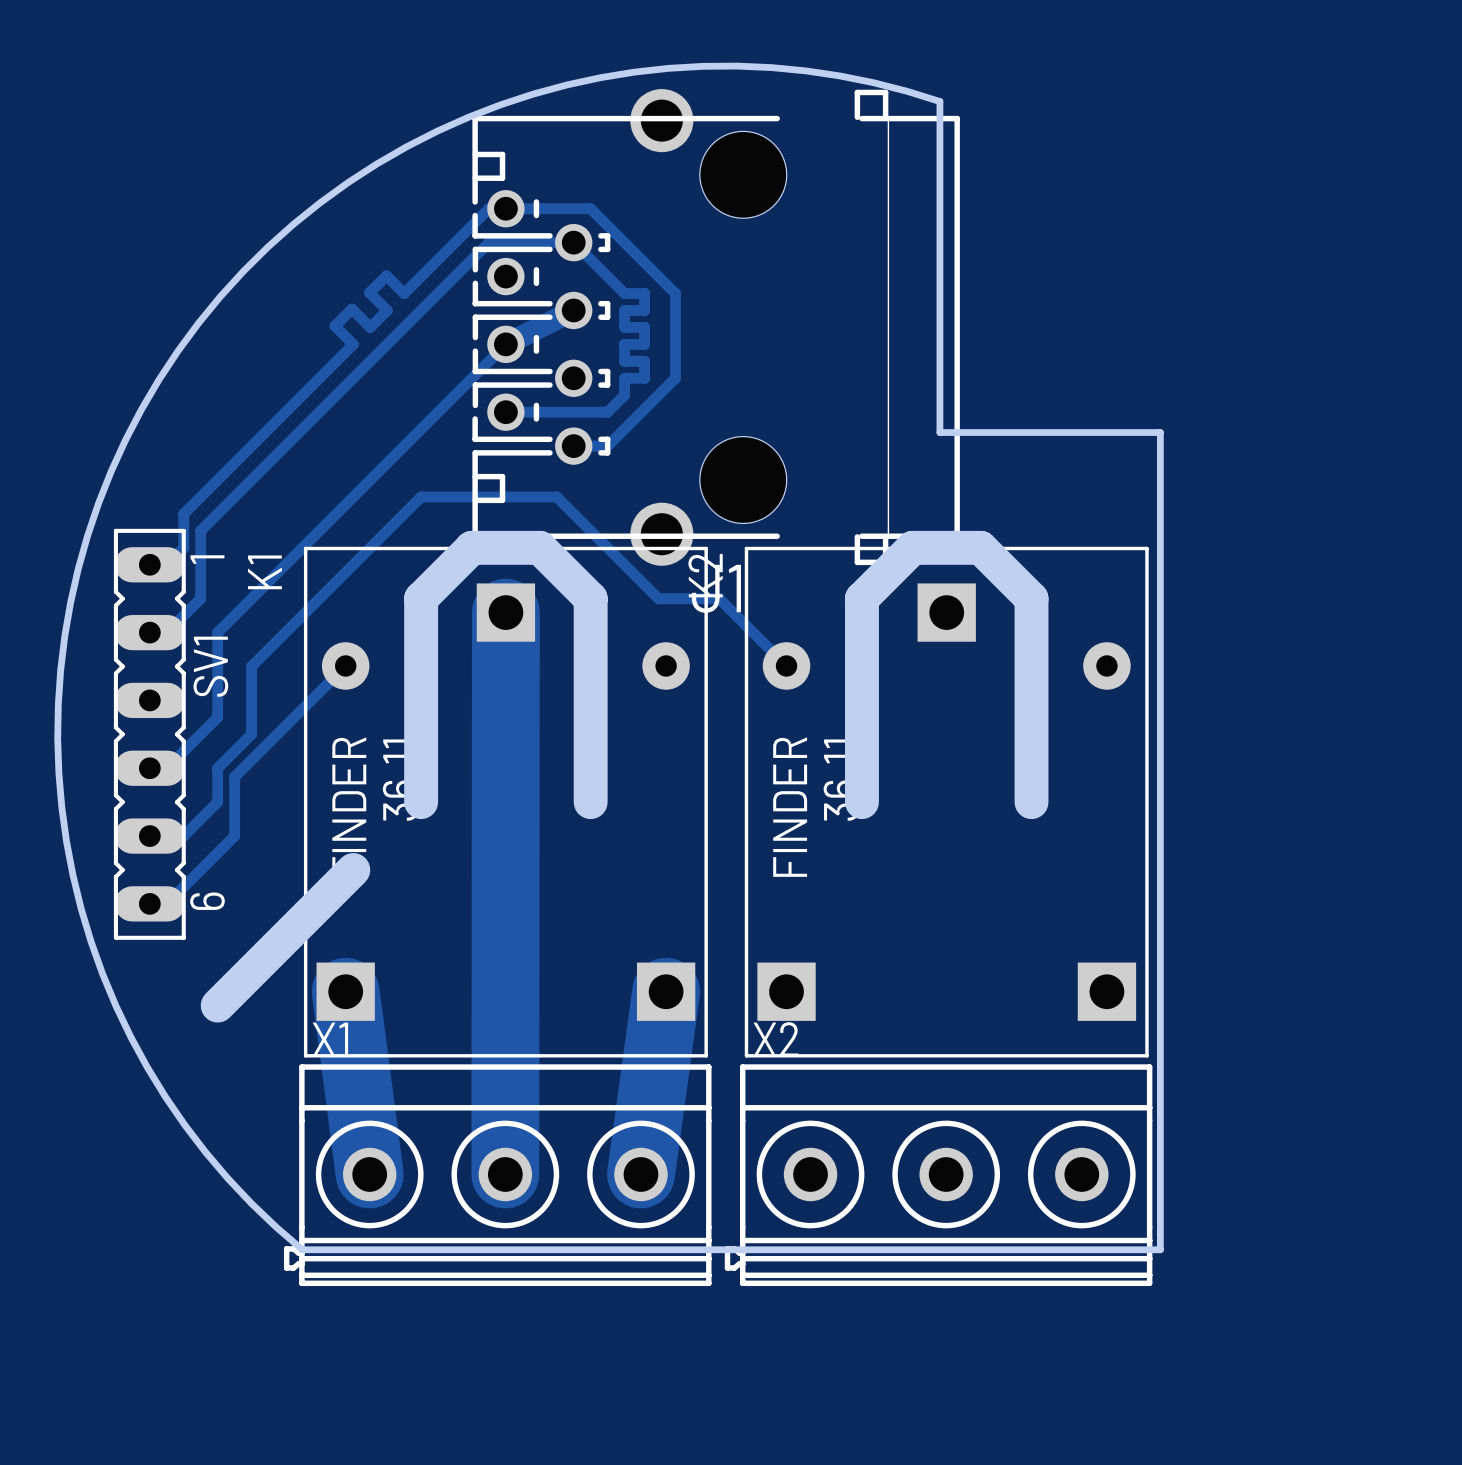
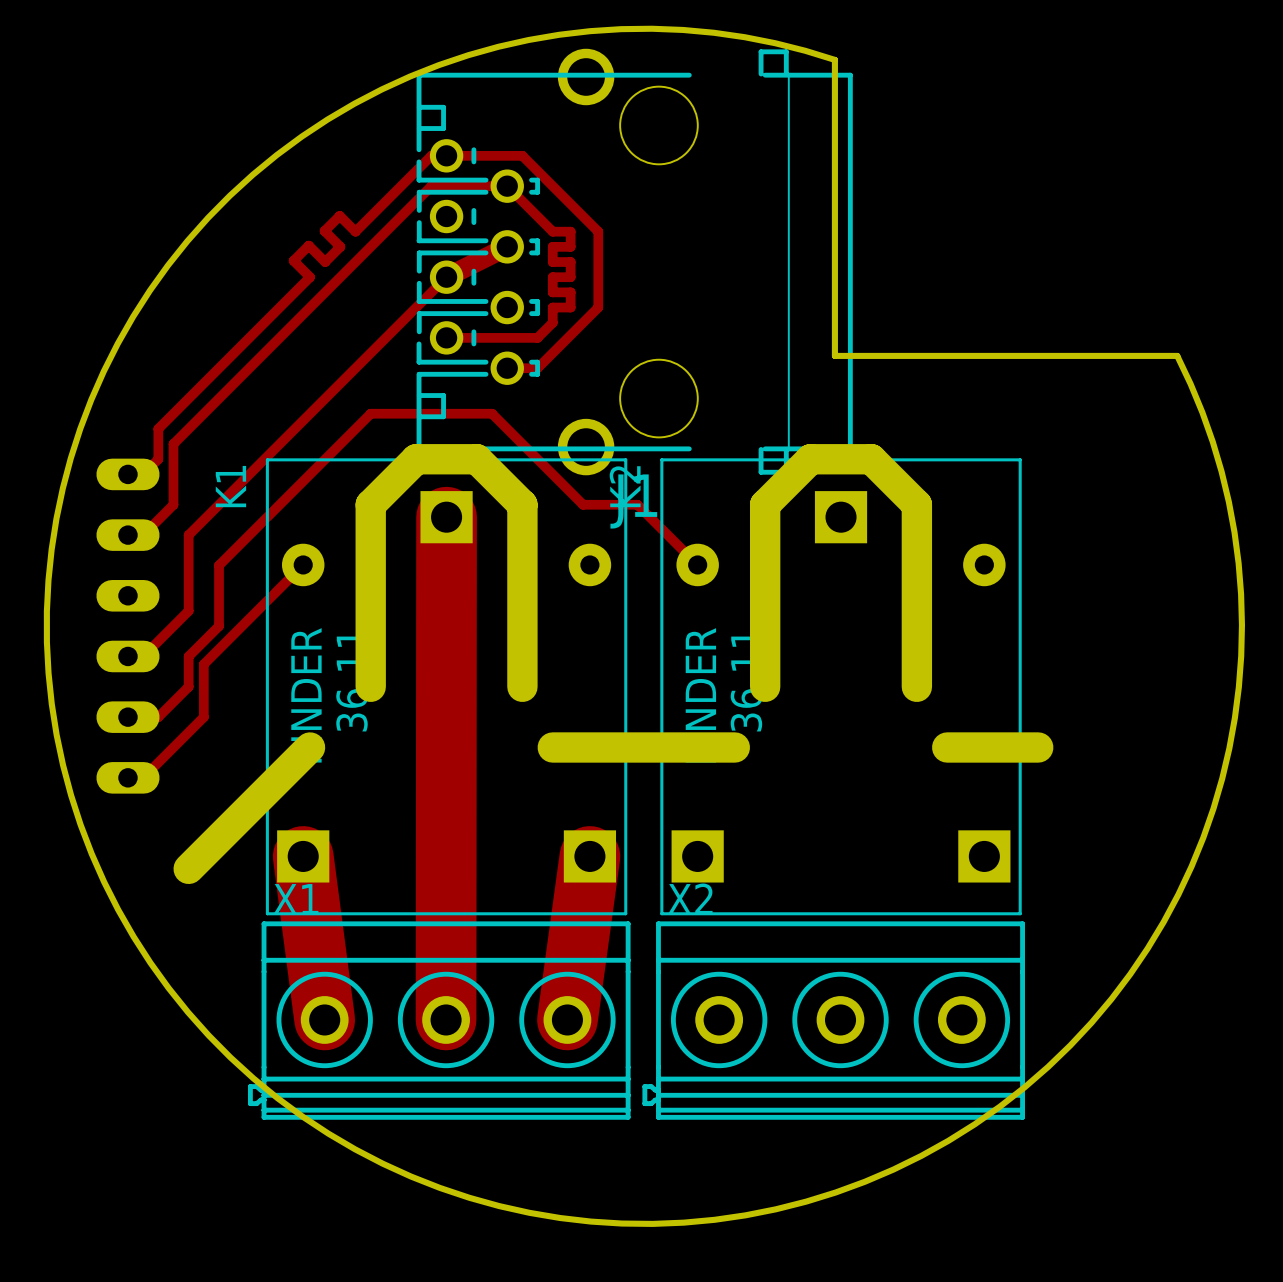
board edge: (939, 101) (873, 82) (840, 75) (806, 70) (737, 66) (703, 66) (634, 72) (566, 84) (501, 104) (437, 131) (377, 163) (348, 182) (293, 224) (243, 271) (220, 296) (178, 351) (141, 409) (125, 439) (98, 503) (78, 568) (64, 636) (58, 704) (58, 773) (61, 807) (73, 875) (91, 941) (102, 974) (130, 1037) (147, 1067) (184, 1124) (205, 1152) (251, 1203) (302, 1249) (1160, 1249) (1160, 432) (939, 432) -> (834, 59) (775, 43) (713, 32) (652, 28) (621, 29) (590, 31) (528, 40) (468, 55) (410, 76) (354, 103) (327, 119) (301, 136) (252, 174) (208, 217) (168, 265) (133, 316) (117, 343) (103, 371) (80, 428) (62, 488) (51, 549) (48, 580) (46, 642) (51, 704) (63, 765) (80, 824) (104, 882) (118, 909) (150, 962) (188, 1012) (230, 1057) (277, 1098) (302, 1116) (328, 1133) (382, 1163) (439, 1187) (499, 1206) (560, 1217) (621, 1223) (683, 1222) (745, 1215) (806, 1201) (864, 1181) (921, 1155) (974, 1124) (1024, 1087) (1048, 1067) (1091, 1022) (1130, 974) (1147, 948) (1178, 894) (1203, 837) (1213, 808) (1229, 748) (1238, 687) (1241, 656) (1241, 594) (1234, 532) (1228, 501) (1212, 441) (1202, 412) (1177, 355) (834, 355)
SV1 side: top (149, 734) -> bottom (127, 626)
board edge: none -> (552, 747) (734, 747)
board edge: none -> (947, 747) (1038, 747)

